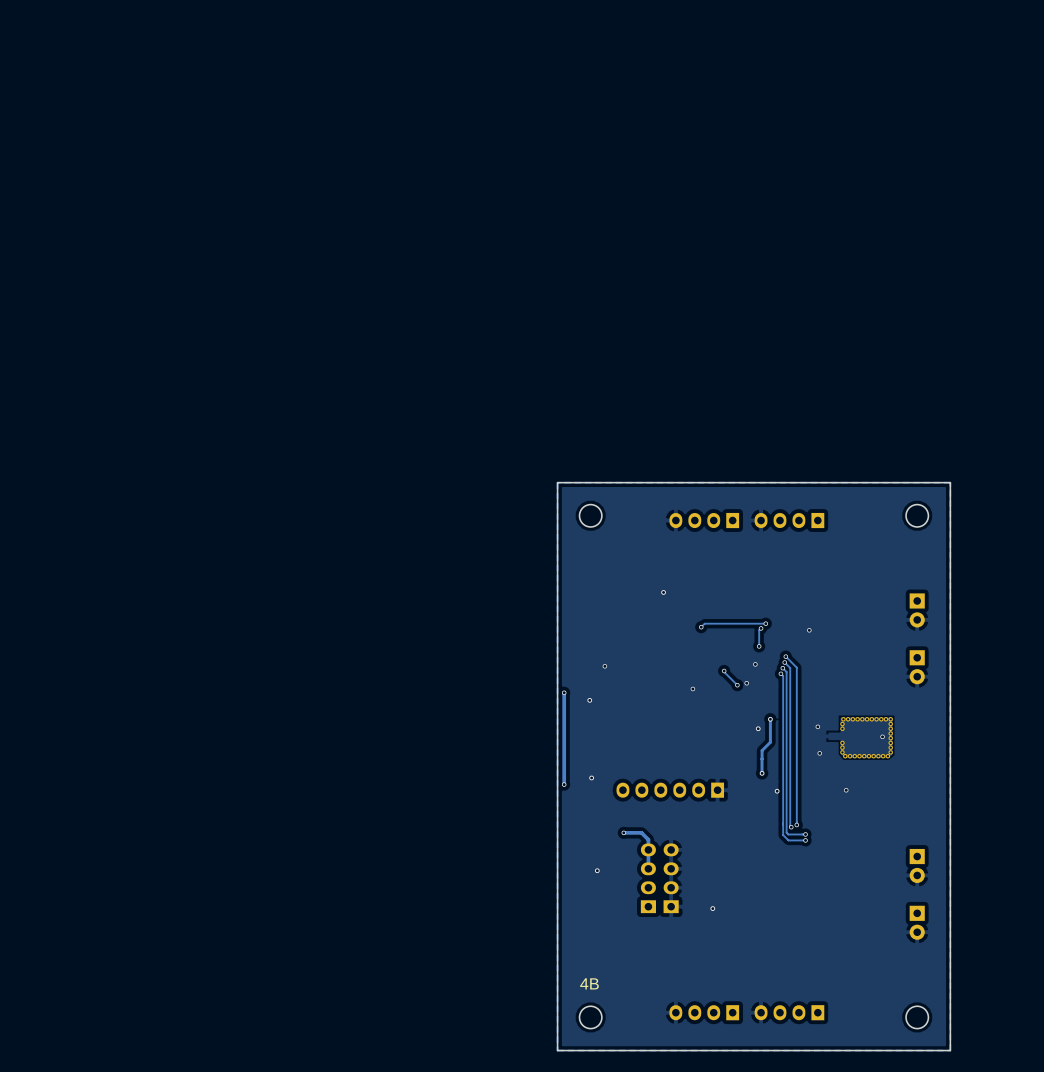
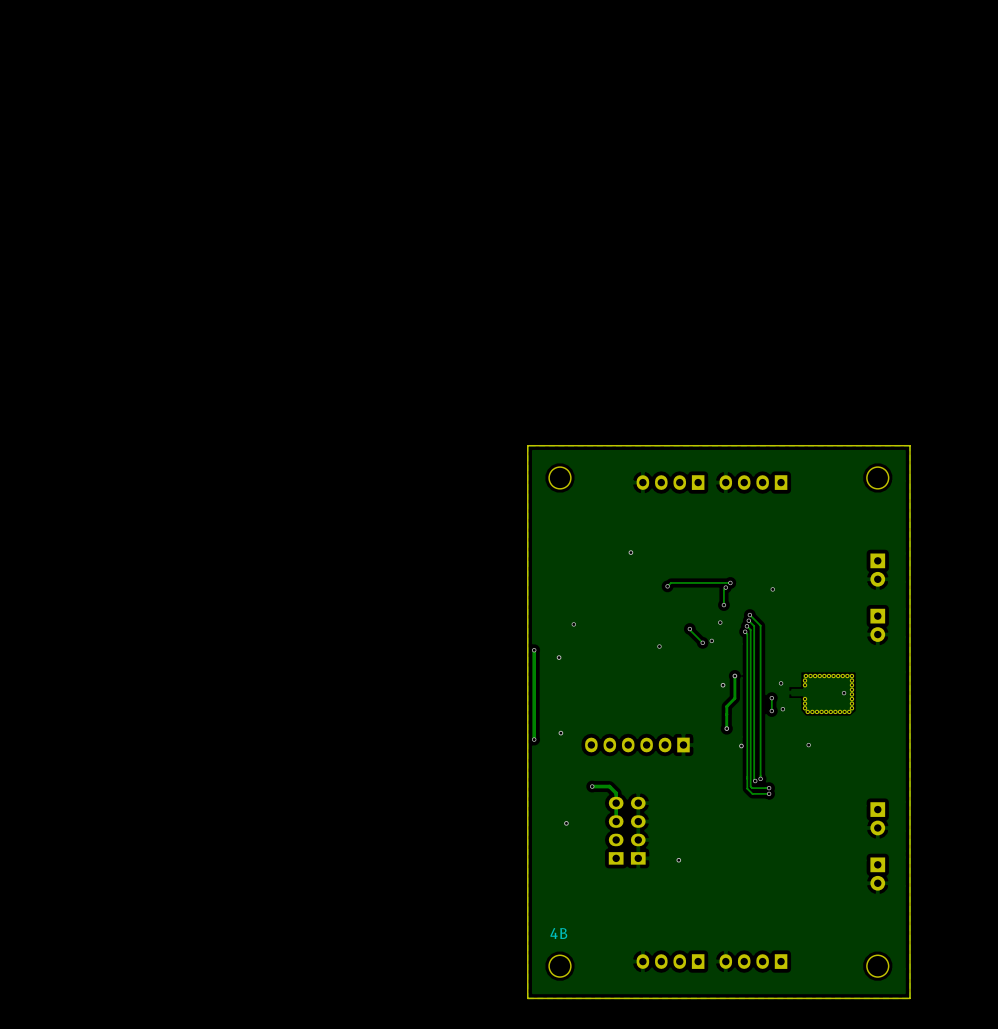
track: none -> (771, 698) (771, 711)
via: none -> (771, 698)
via: none -> (771, 711)

